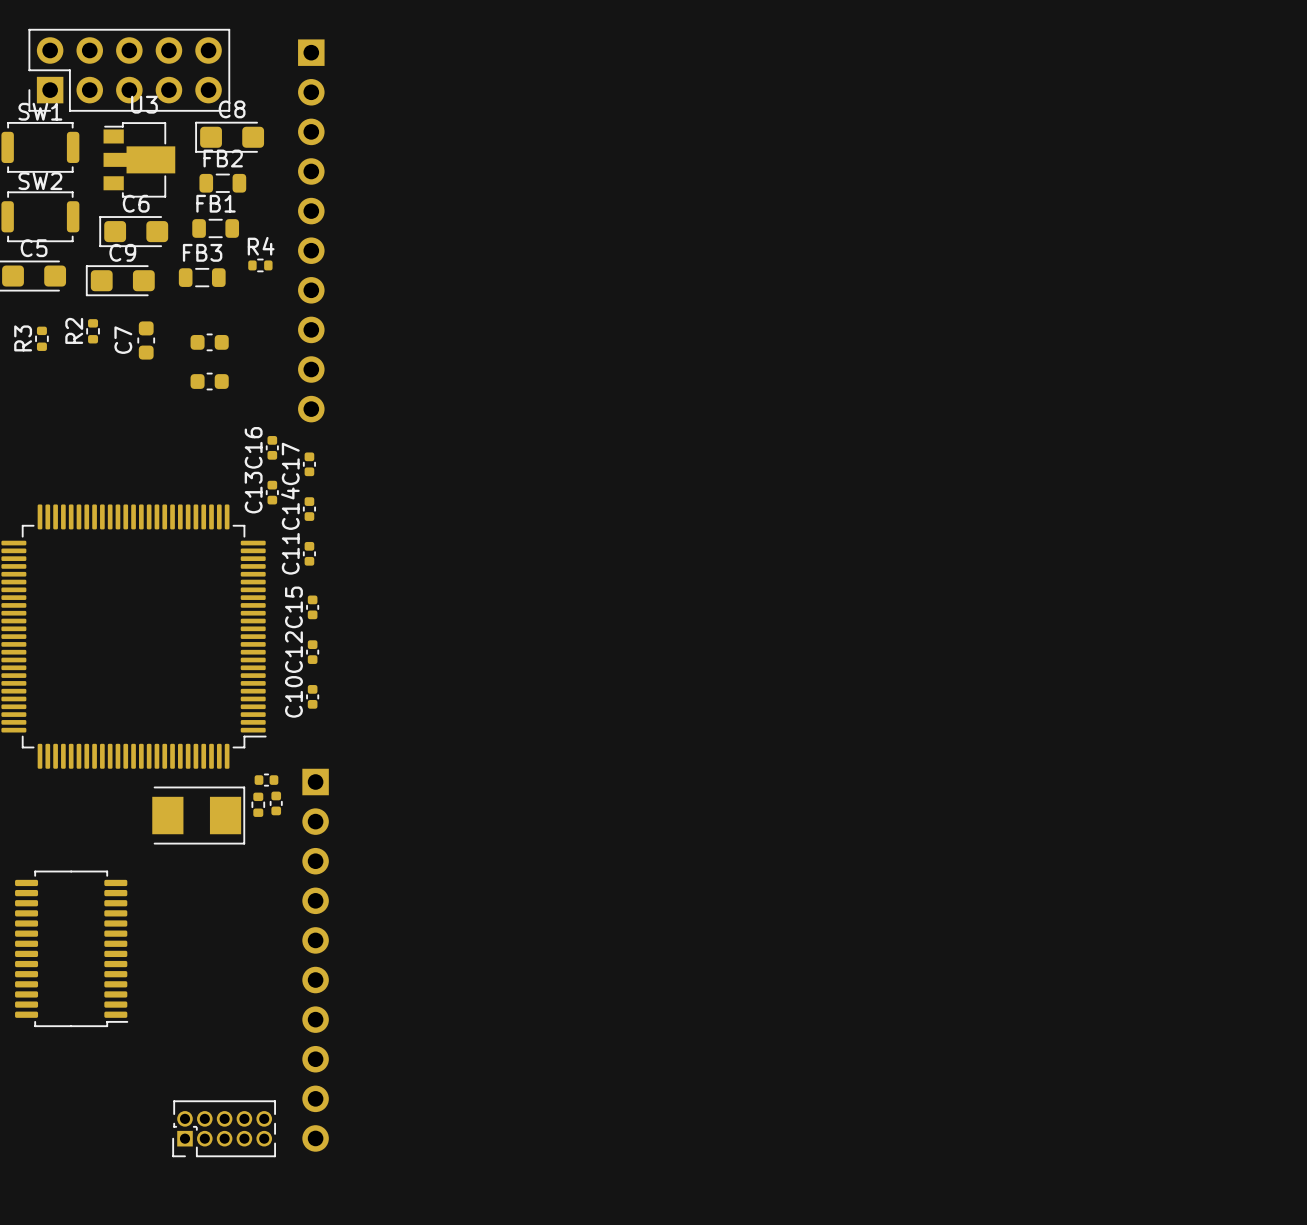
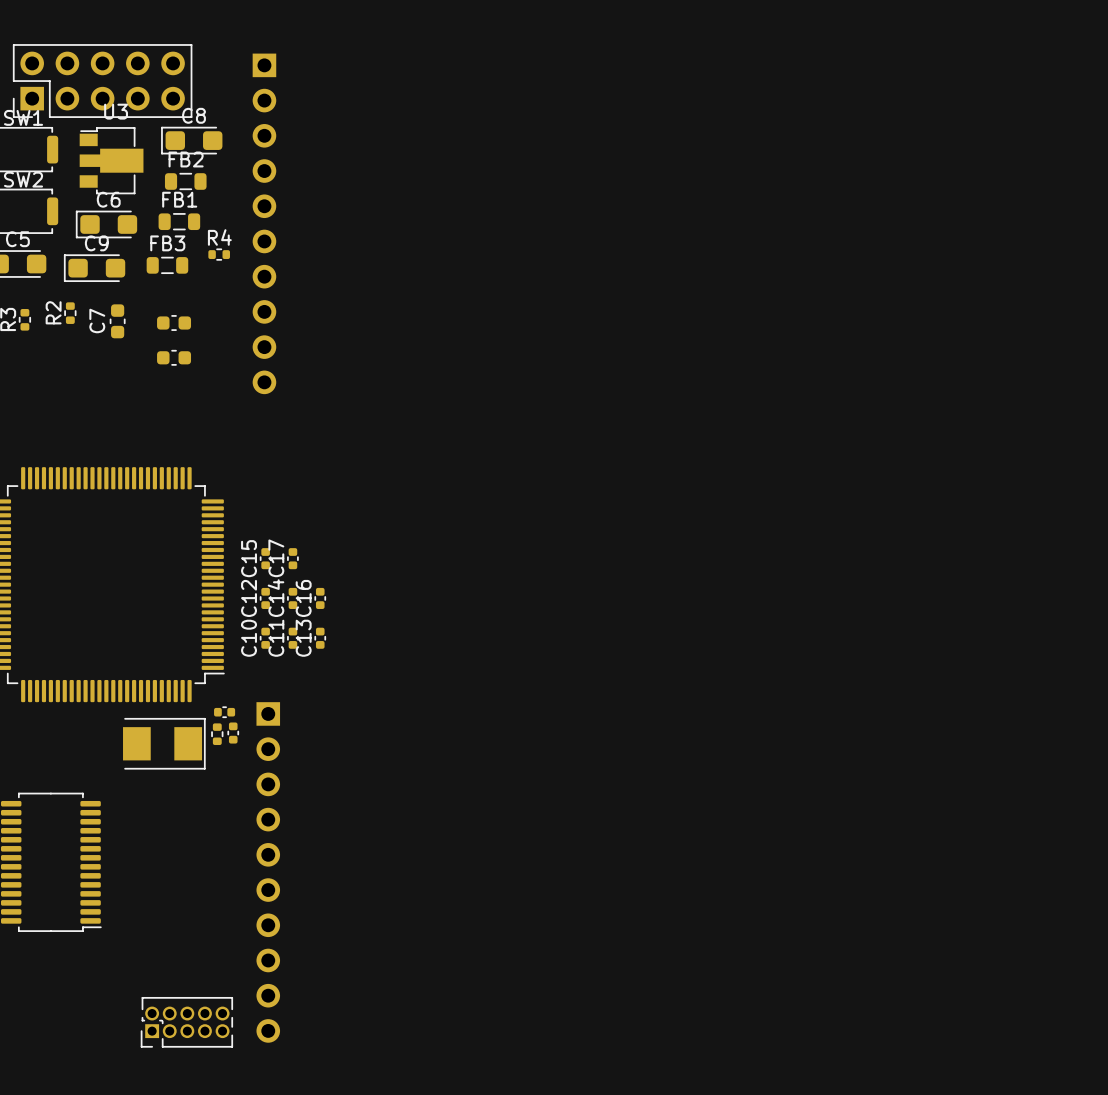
C16 position: (272, 447) -> (320, 598)
C17 position: (309, 464) -> (292, 558)
C13 position: (272, 492) -> (320, 638)
C14 position: (309, 509) -> (292, 598)
C11 position: (309, 553) -> (292, 638)

